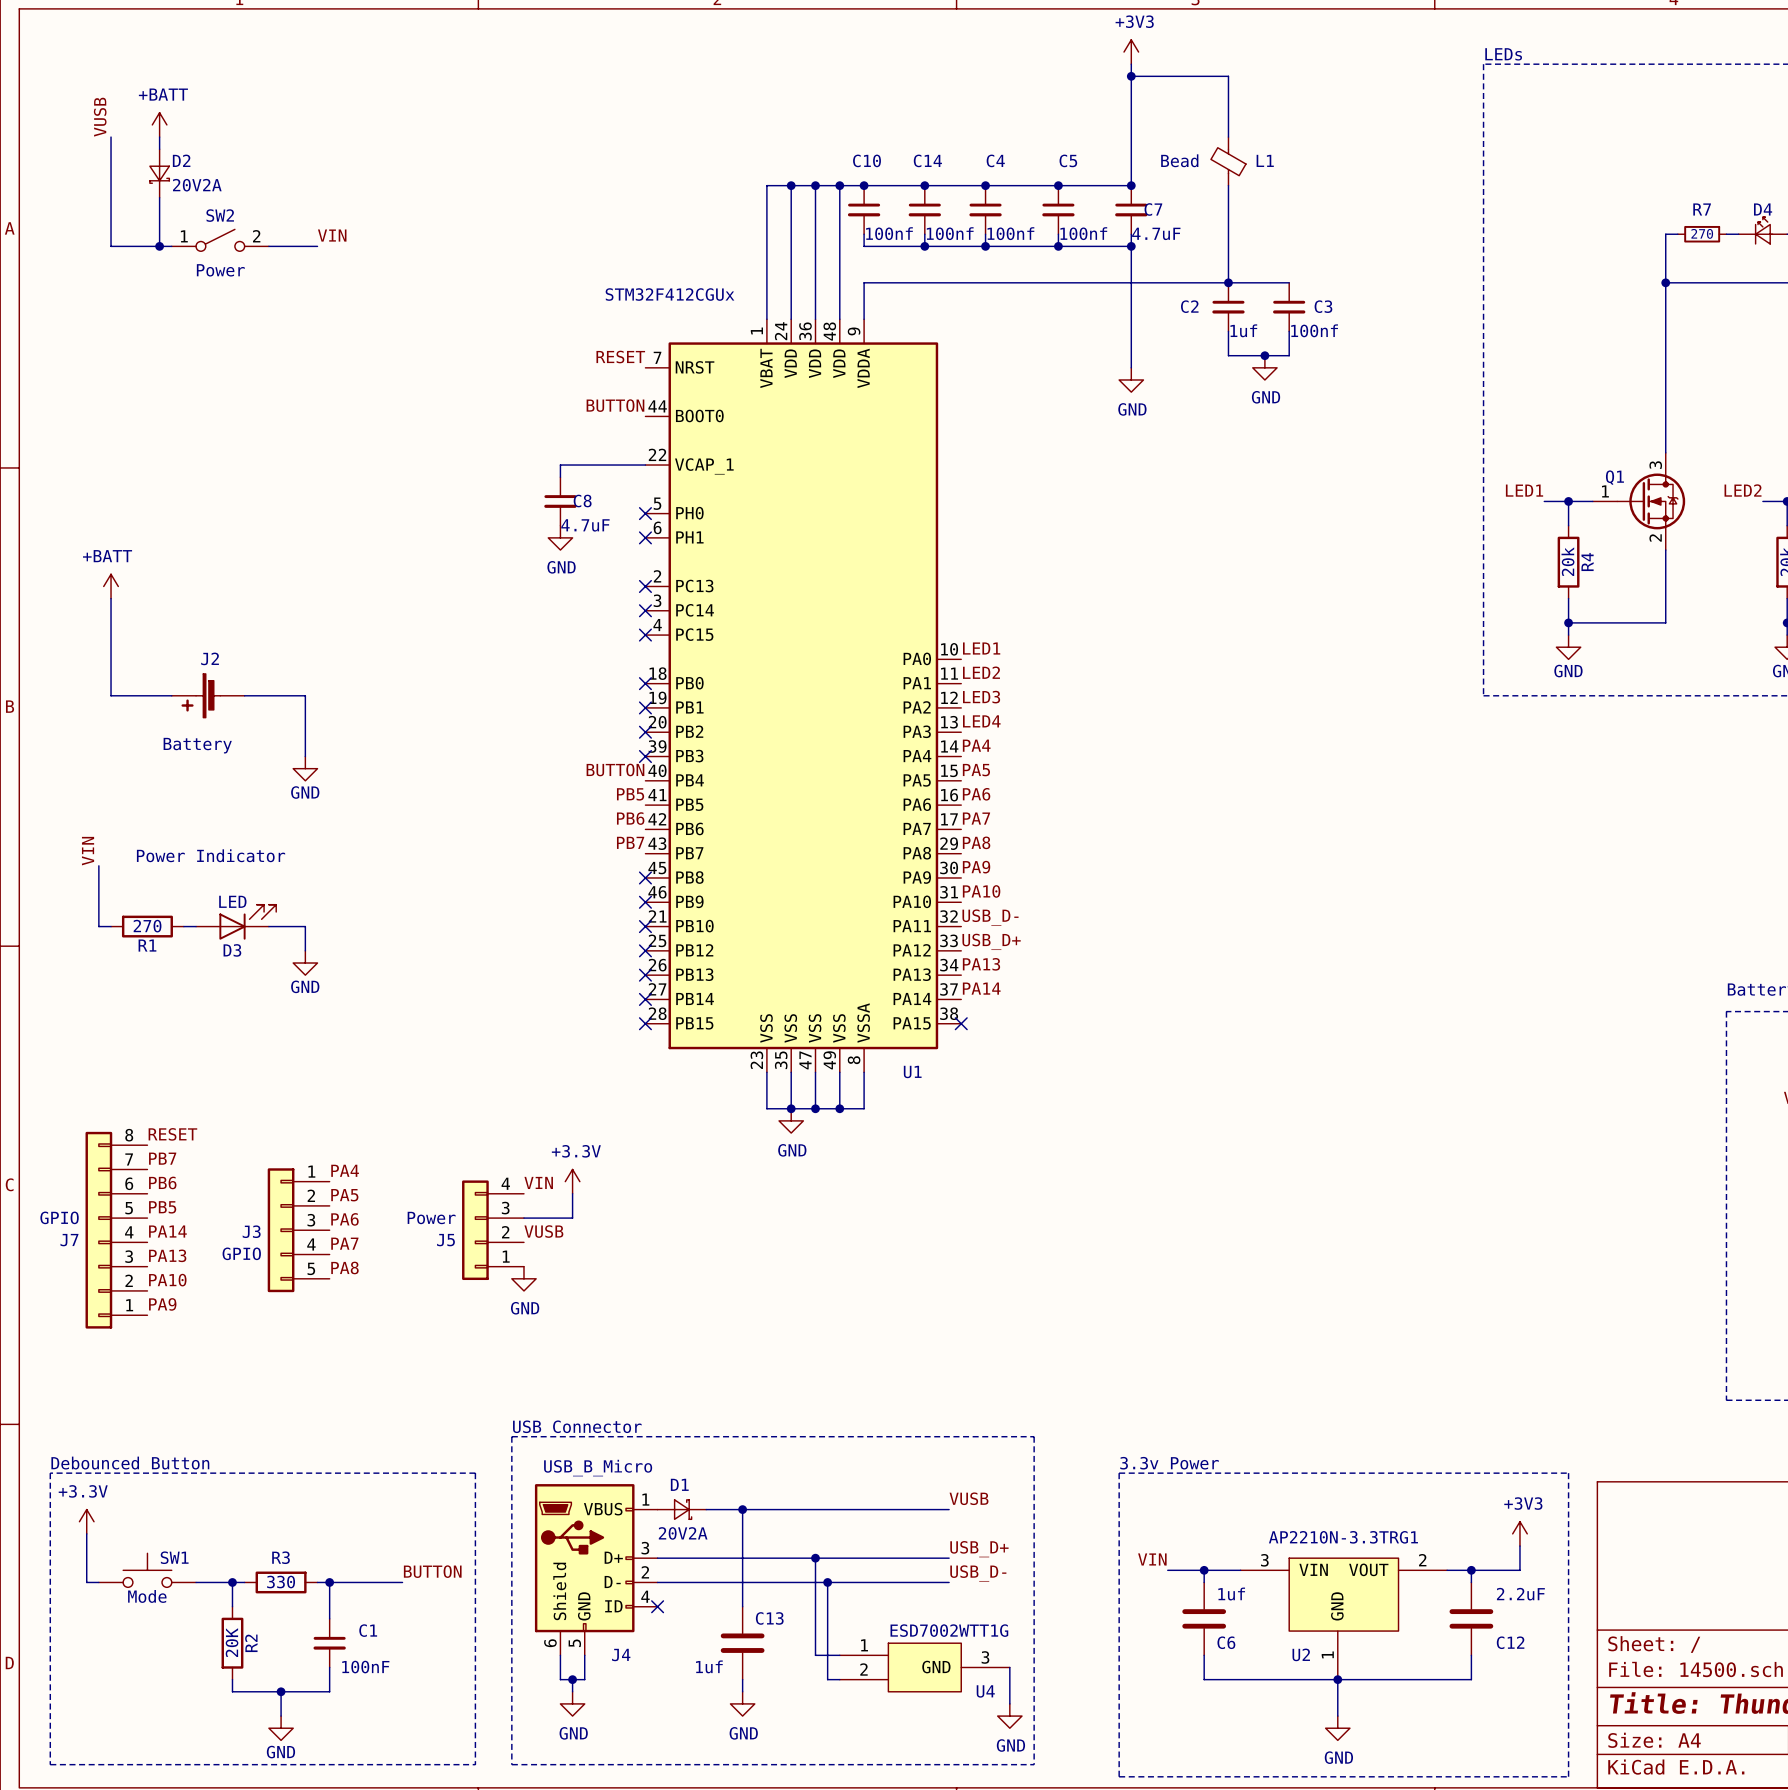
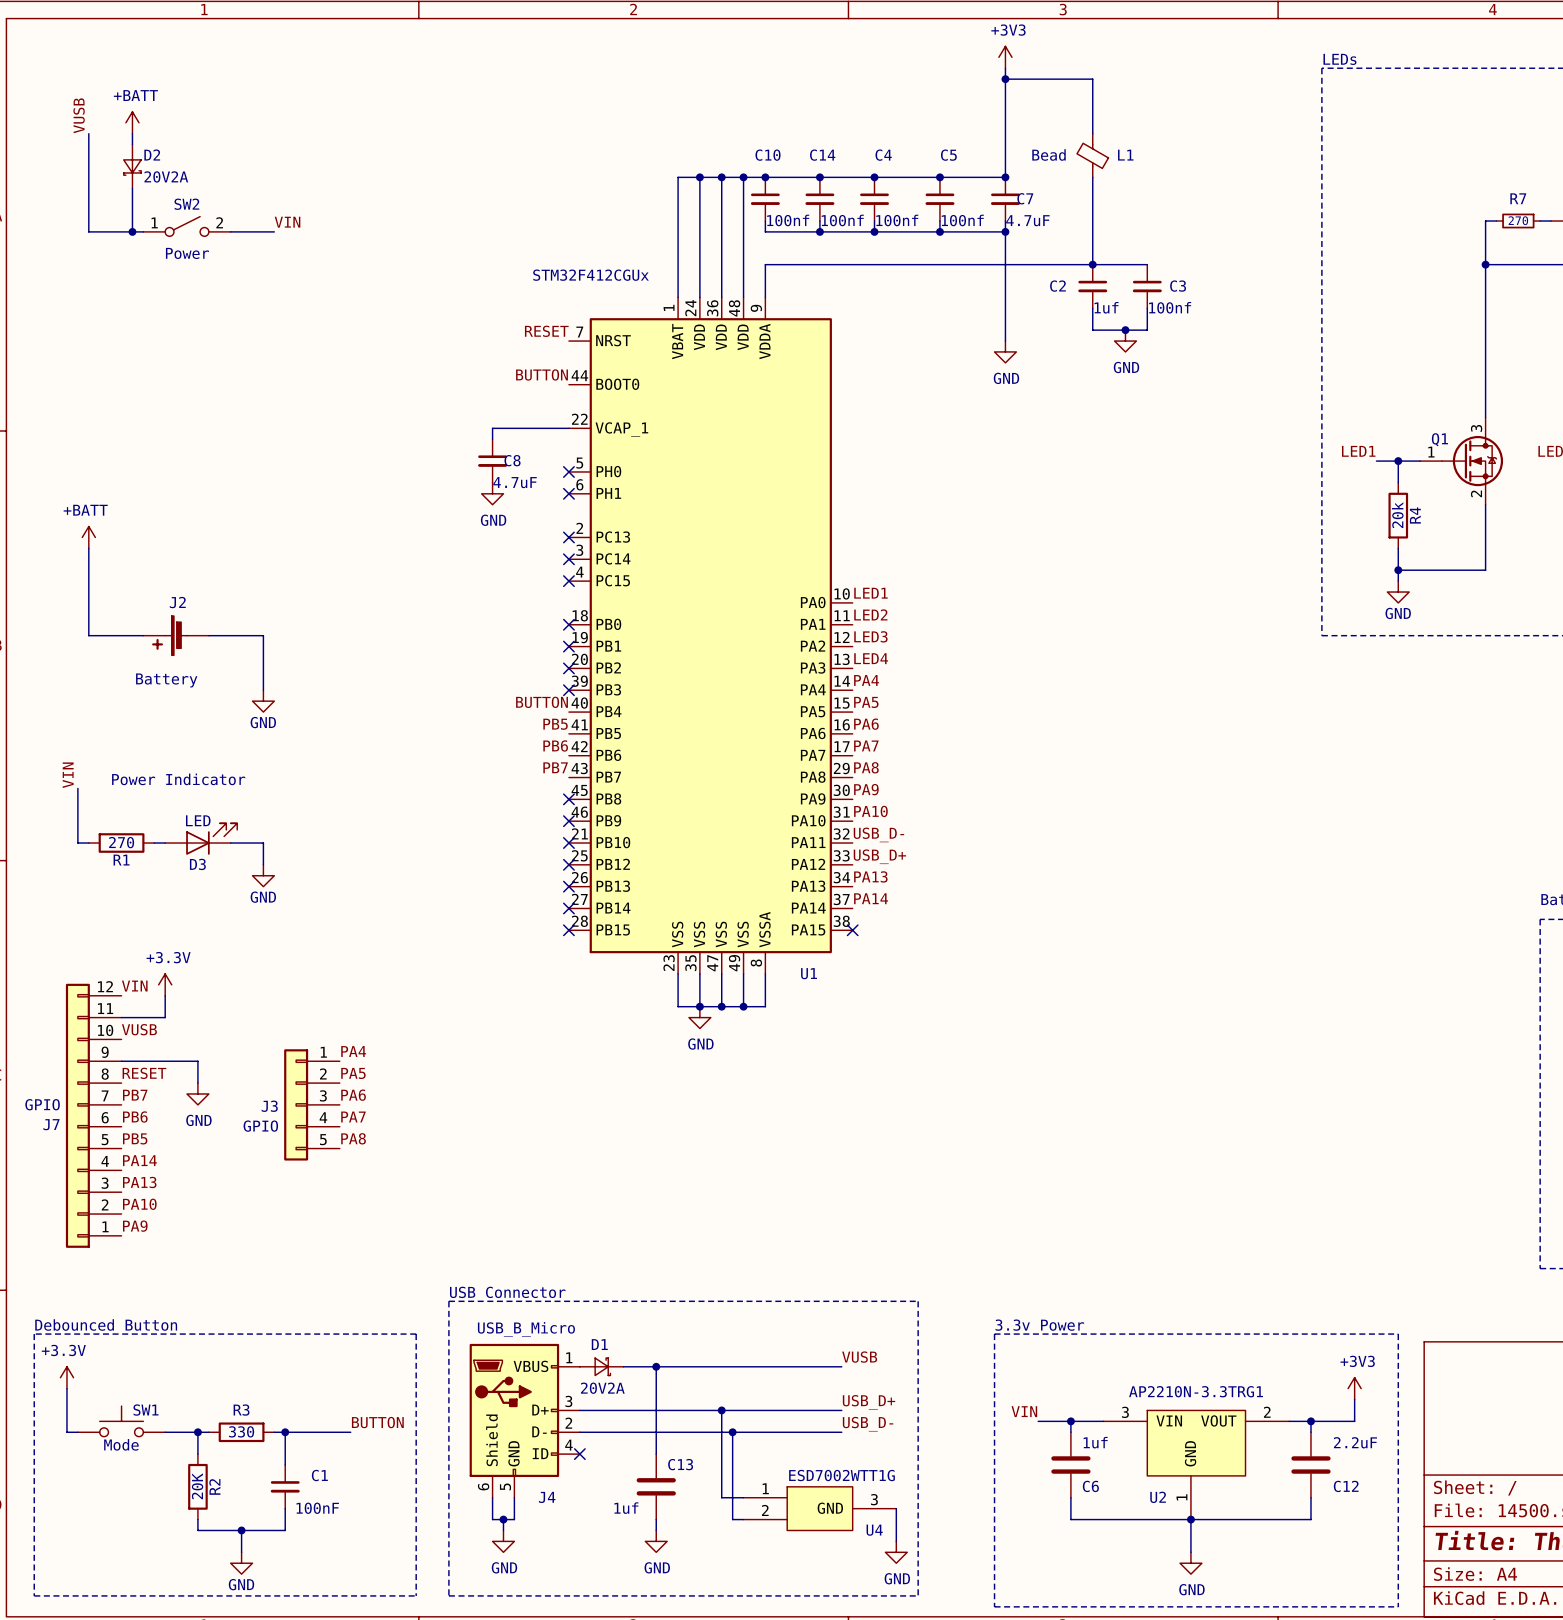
power symbol: none -> +3.3V (165, 984)
label: none -> VIN (134, 986)
wire: none -> (165, 995) (165, 1017) (121, 1017)
J7 symbol: [85, 1131, 148, 1329] -> [65, 983, 122, 1248]
label: RESET (172, 1134) -> VUSB (139, 1029)
label: PB7 (162, 1158) -> none
wire: none -> (121, 1061) (197, 1061) (197, 1083)
label position: PA4 (345, 1170) -> PA4 (353, 1051)
power symbol: +3.3V (572, 1181) -> none
label: PB6 (162, 1182) -> RESET (144, 1073)
label: VIN (538, 1182) -> none
wire: (572, 1193) (572, 1218) (523, 1218) -> none
label position: PA5 (344, 1195) -> PA5 (353, 1073)
power symbol: none -> GND (197, 1093)
label: PB5 (162, 1207) -> PB7 (135, 1095)
label position: PA6 (344, 1219) -> PA6 (353, 1095)
J3 position: (298, 1230) -> (311, 1104)
J5: Power (493, 1230) -> none
label: PA14 (167, 1231) -> PB6 (135, 1116)
label: VUSB (543, 1231) -> none
label position: PA7 (344, 1243) -> PA7 (353, 1116)
label: PA13 (167, 1255) -> PB5 (135, 1138)
label position: PA8 (344, 1267) -> PA8 (353, 1138)
power symbol: GND (523, 1278) -> none
label: PA10 (167, 1280) -> PA14 (139, 1160)
label: PA9 (162, 1304) -> PA13 (139, 1182)
label: none -> PA10 (139, 1204)
label: none -> PA9 (135, 1226)

